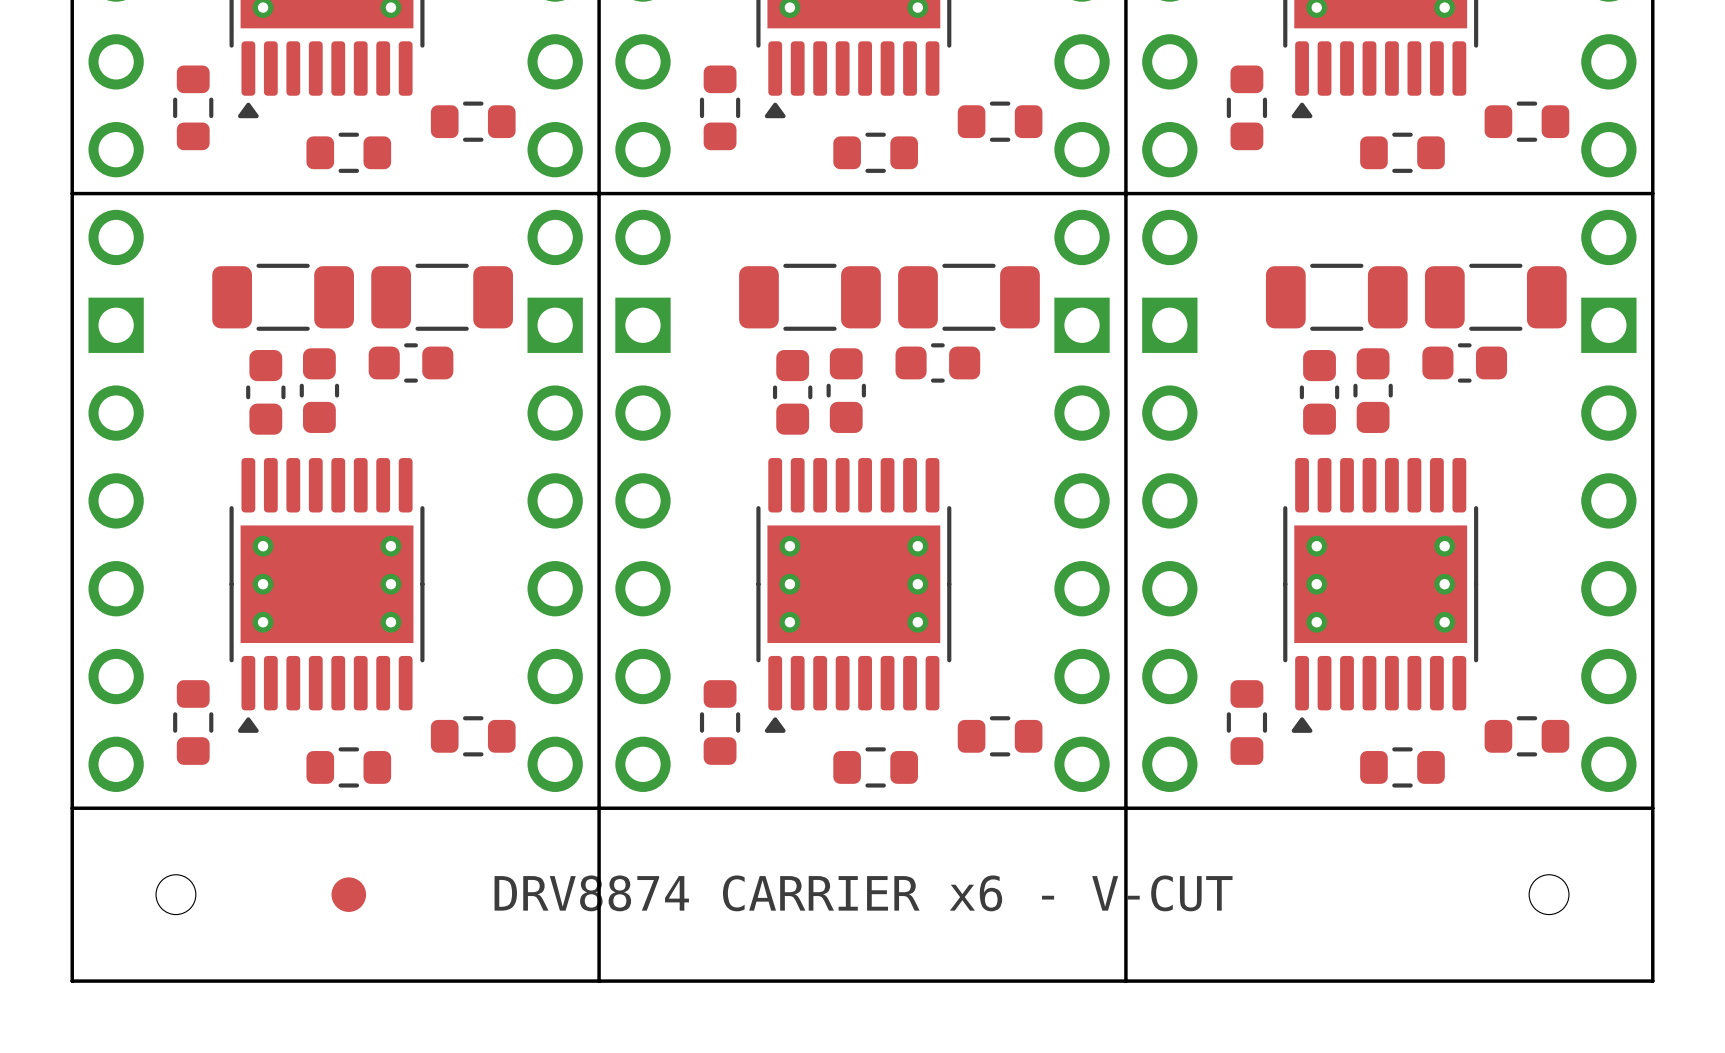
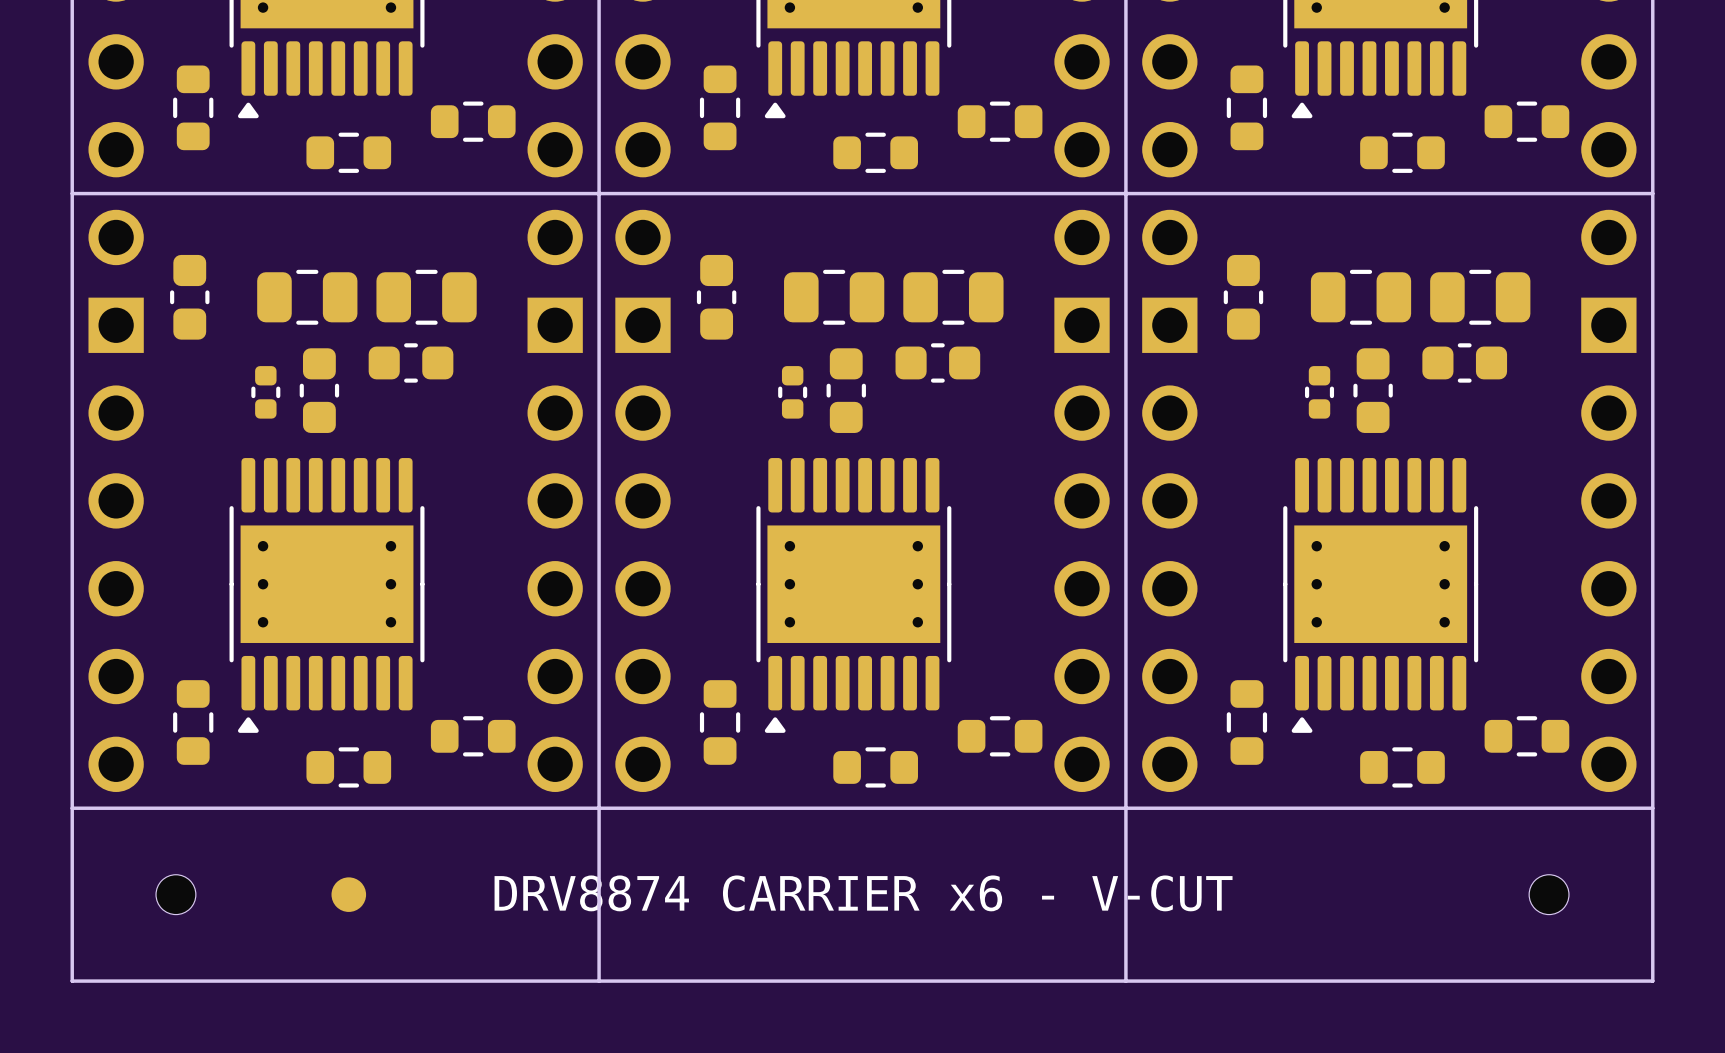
part footprint: [212, 263, 354, 331] -> [257, 269, 358, 325]
part footprint: [371, 263, 514, 331] -> [376, 269, 477, 325]
part footprint: [739, 263, 881, 331] -> [784, 269, 885, 325]
part footprint: [898, 263, 1040, 331] -> [903, 269, 1004, 325]
part footprint: [1265, 263, 1408, 331] -> [1310, 269, 1412, 325]
part footprint: [1424, 263, 1567, 331] -> [1430, 269, 1531, 325]
part: none -> (189, 297)
part: none -> (716, 297)
part: none -> (1243, 297)
part footprint: [246, 350, 286, 435] -> [251, 366, 281, 419]
part footprint: [772, 350, 813, 435] -> [778, 366, 808, 419]
part footprint: [1299, 350, 1340, 435] -> [1304, 366, 1335, 419]

